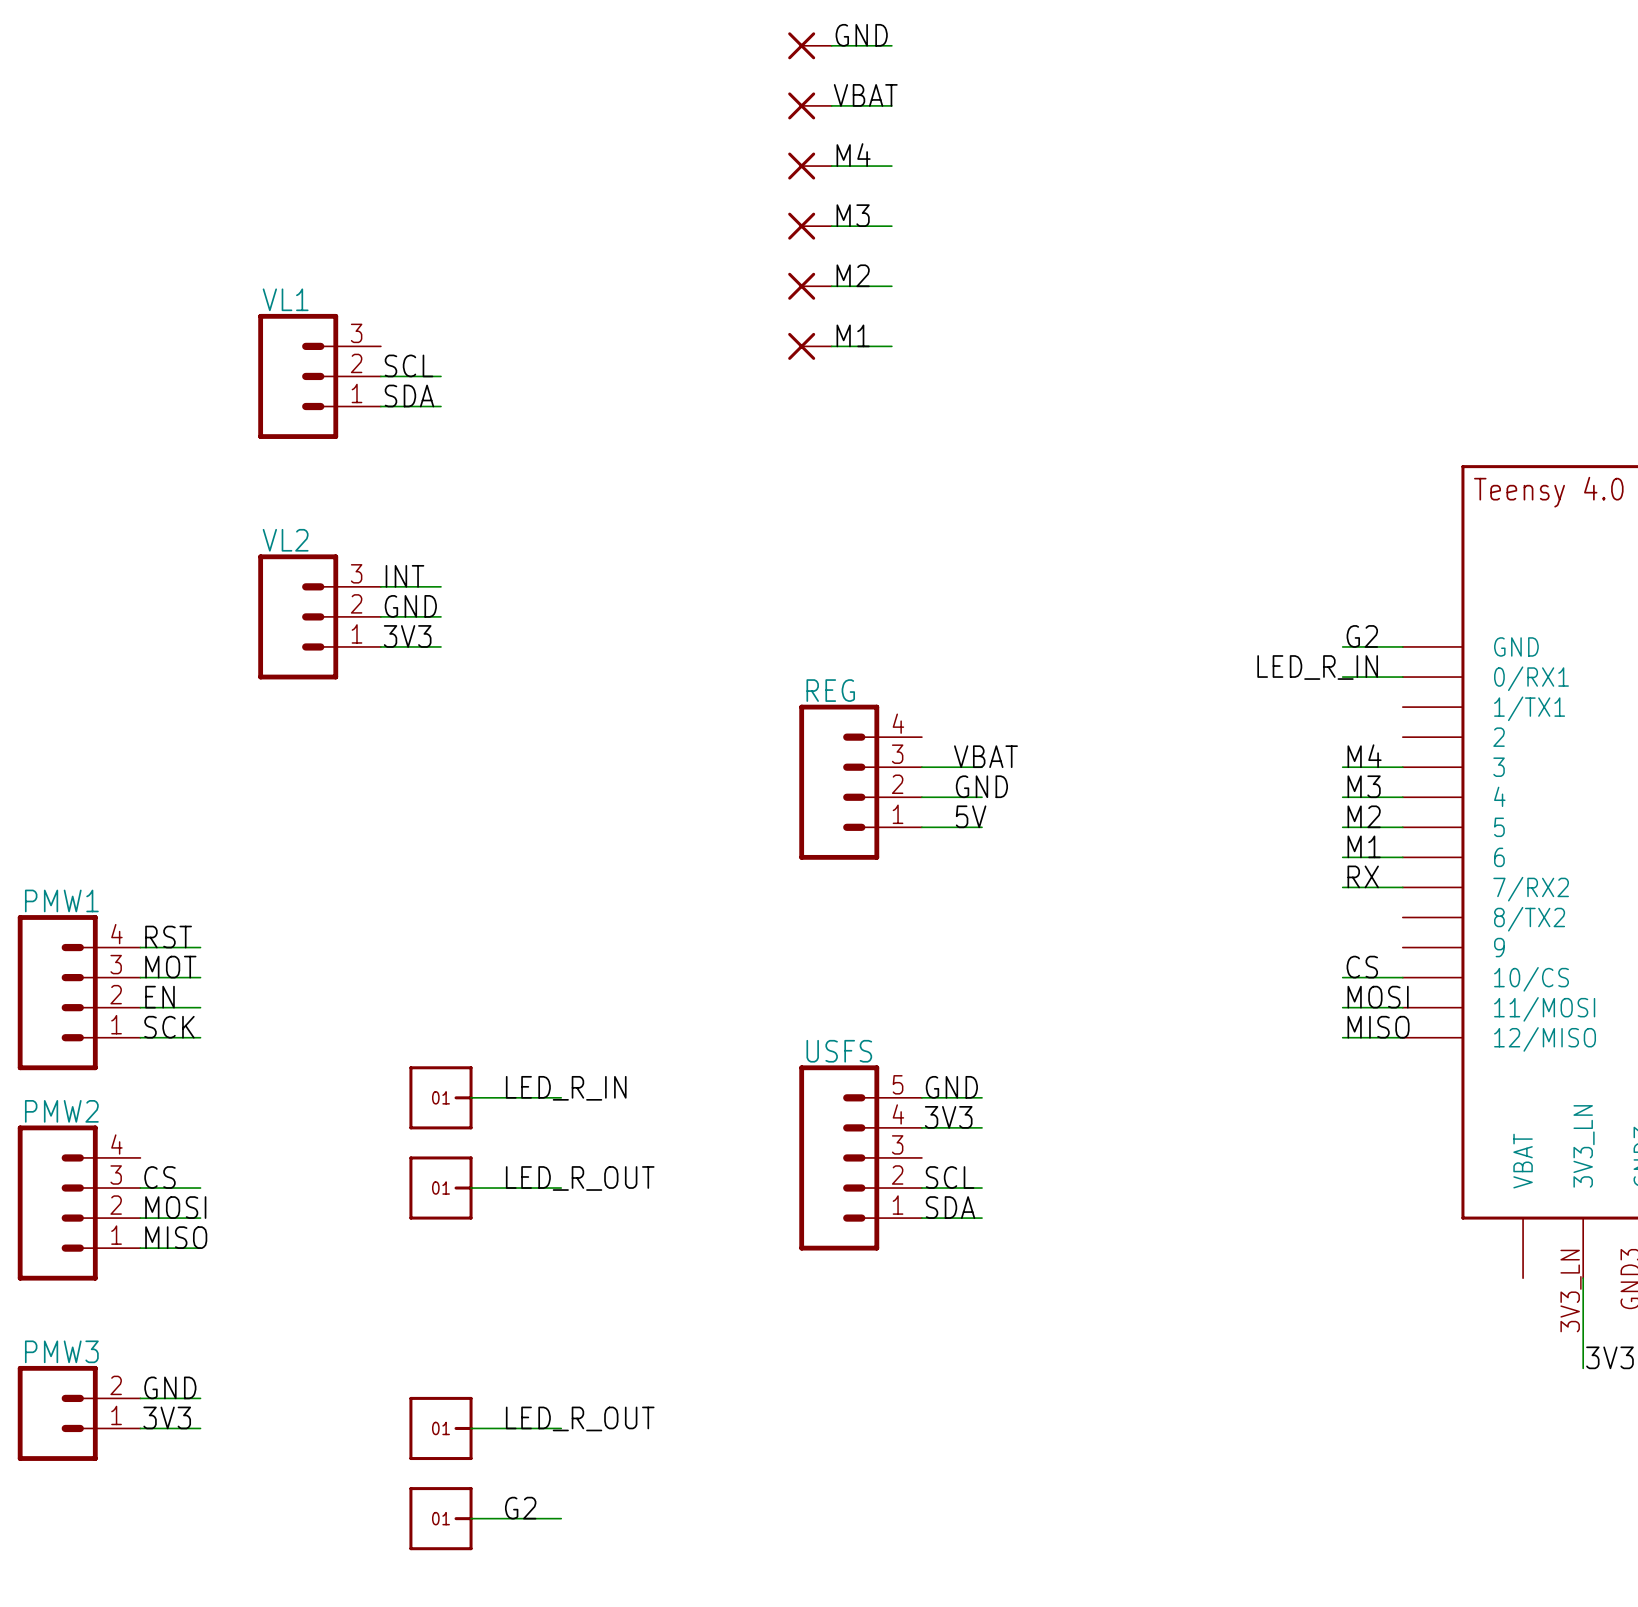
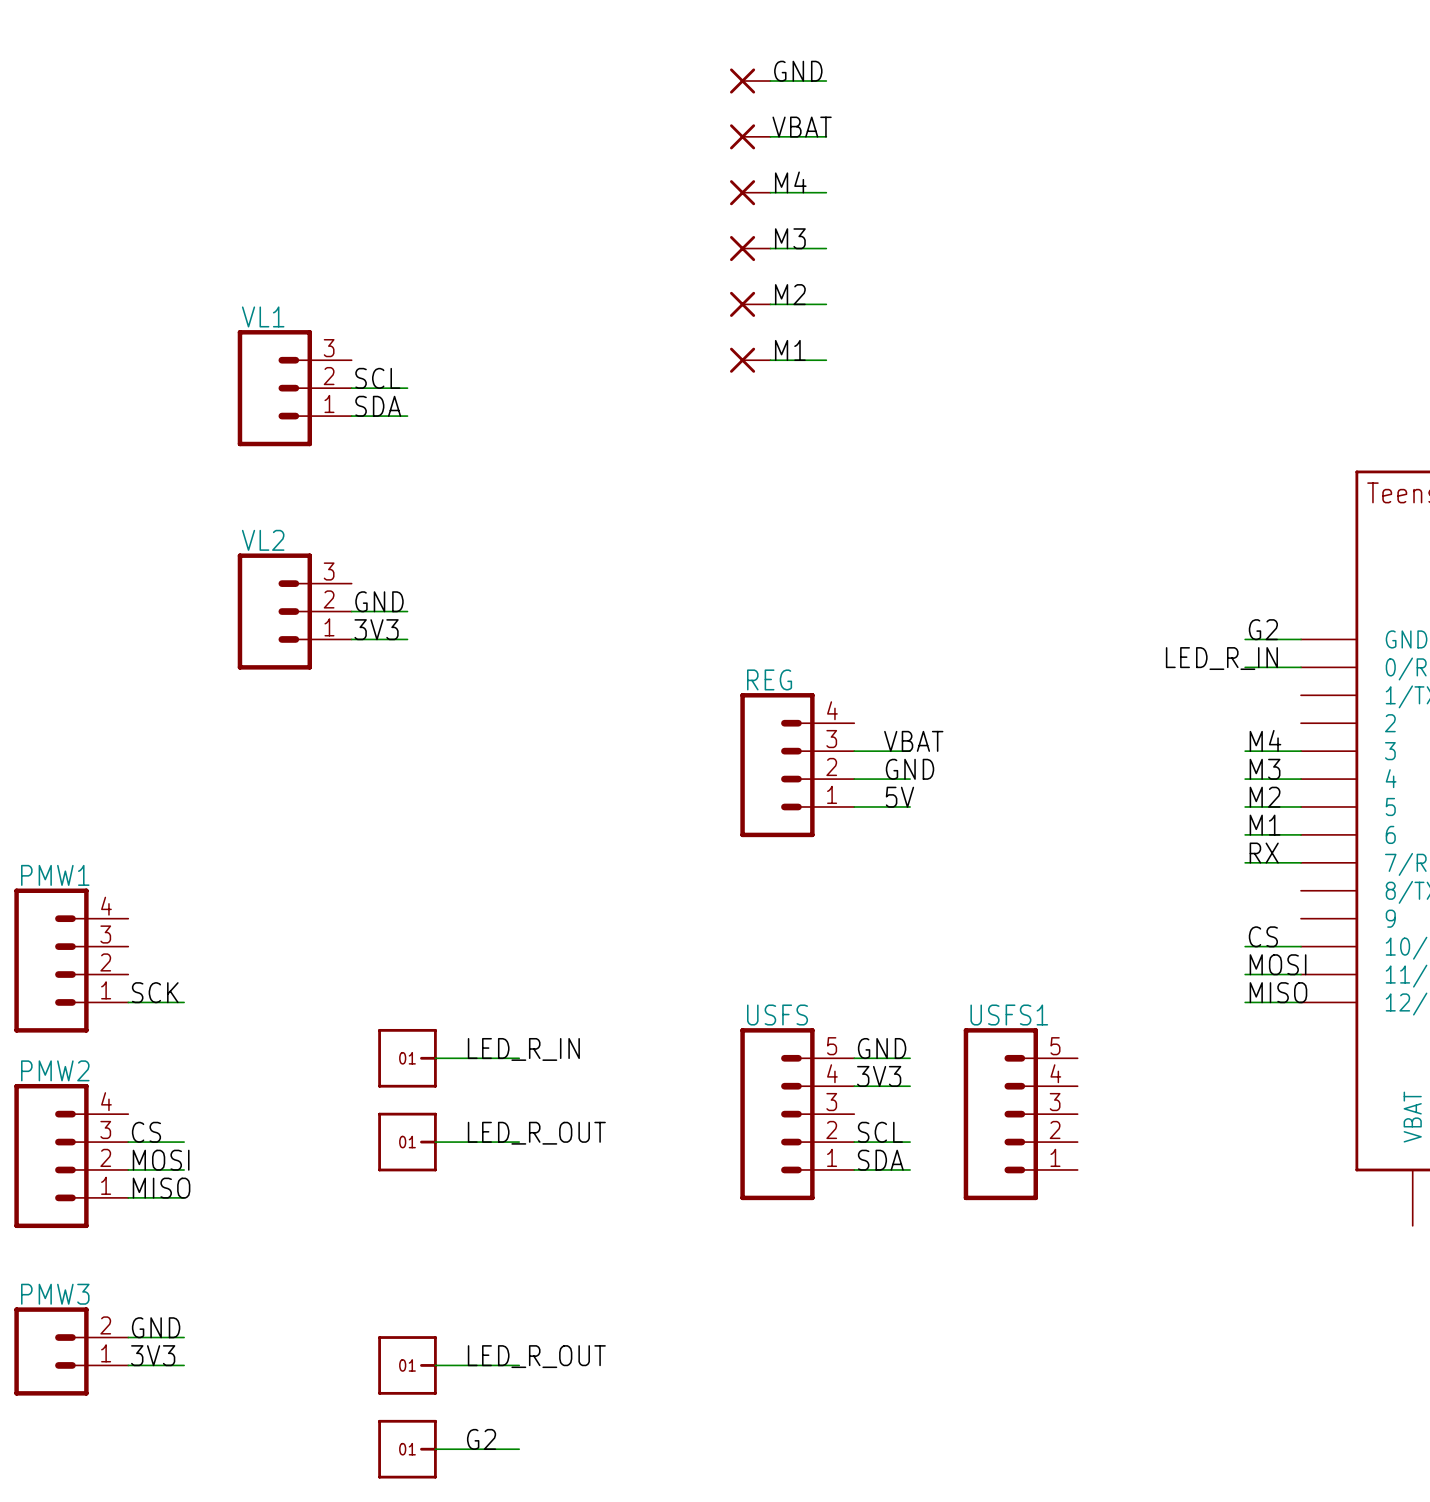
label: INT (404, 576) -> none
wire: (380, 586) (440, 586) -> none
label: RST (168, 937) -> none
wire: (140, 947) (200, 947) -> none
label: MOT (170, 967) -> none
wire: (140, 977) (200, 977) -> none
label: EN (159, 997) -> none
wire: (140, 1007) (200, 1007) -> none
USFS1: none -> (1020, 1114)

